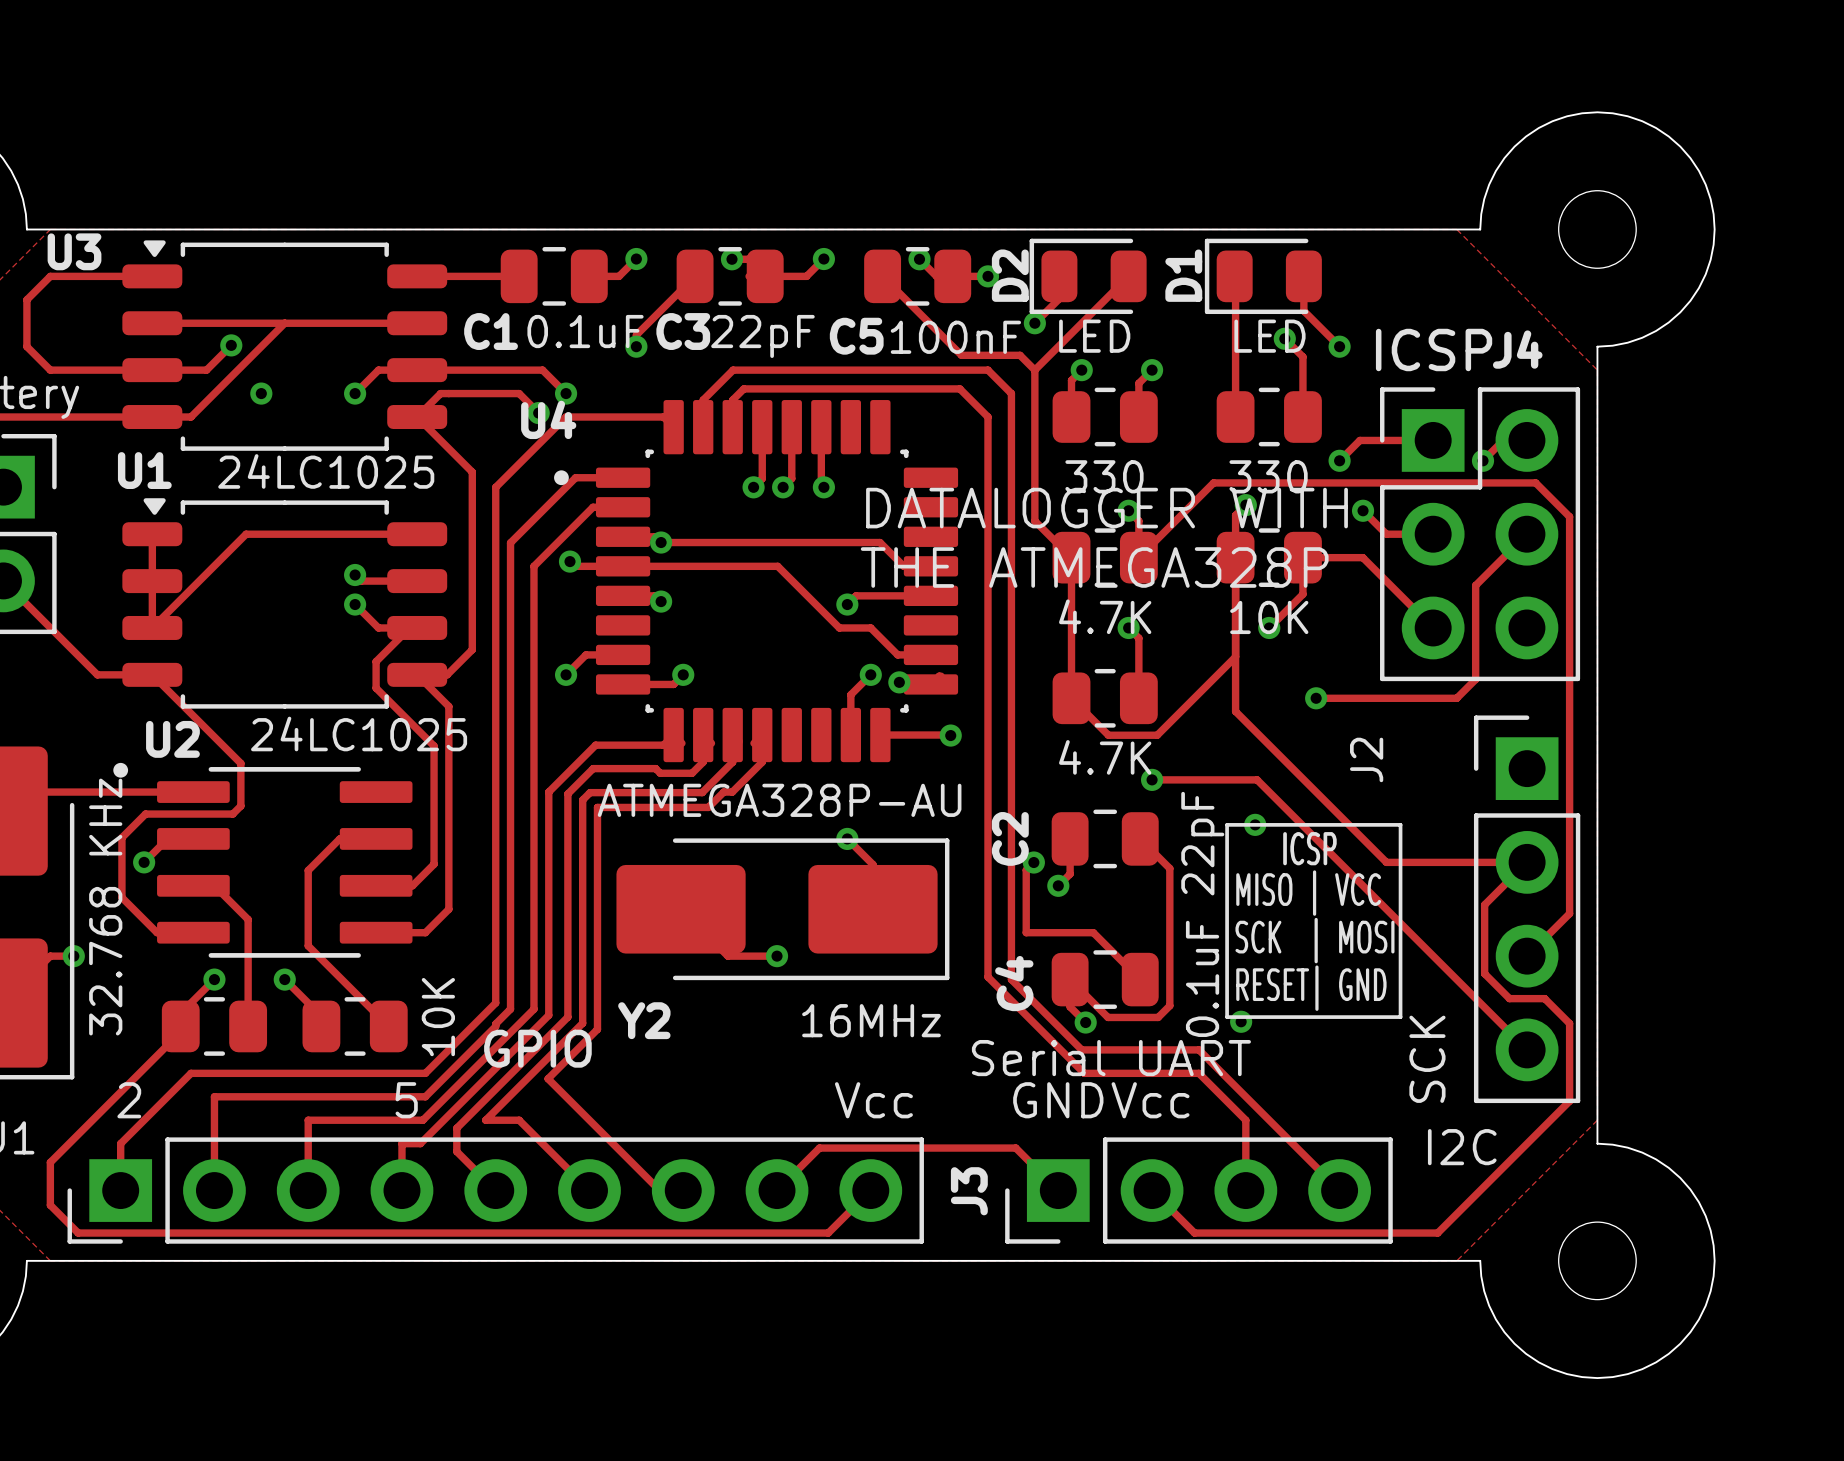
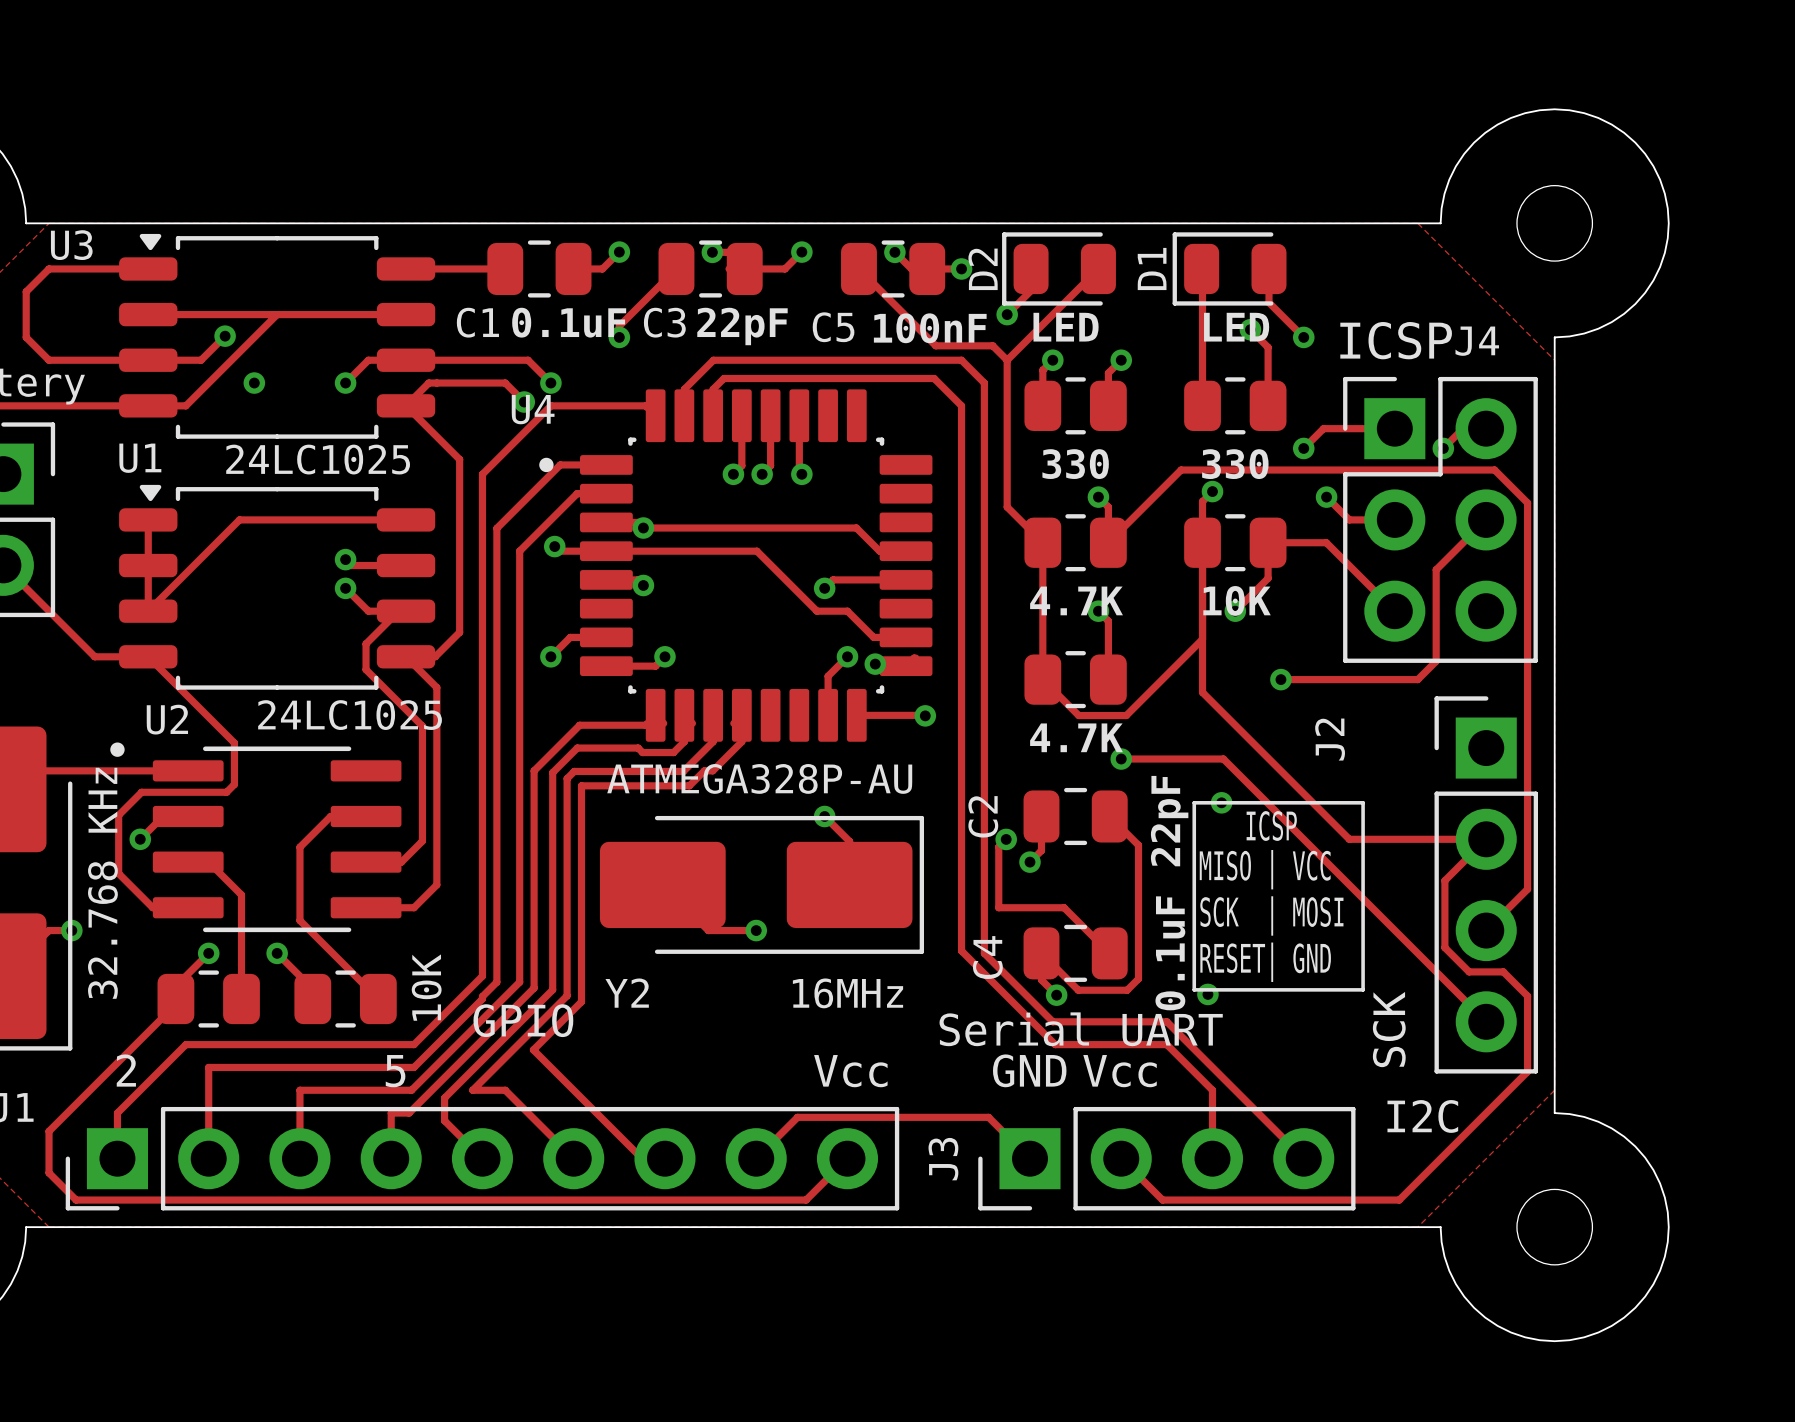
text: DATALOGGER WITH (1107, 508) -> none
text: THE ATMEGA328P (1094, 567) -> none

